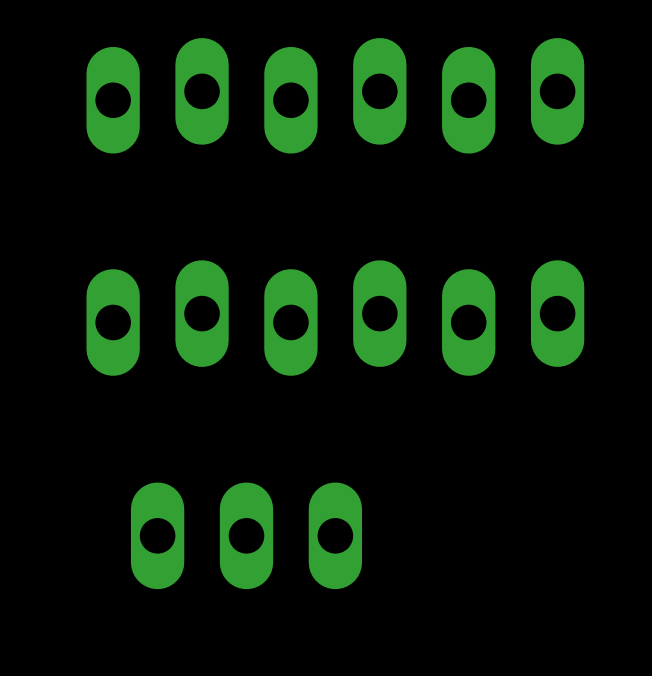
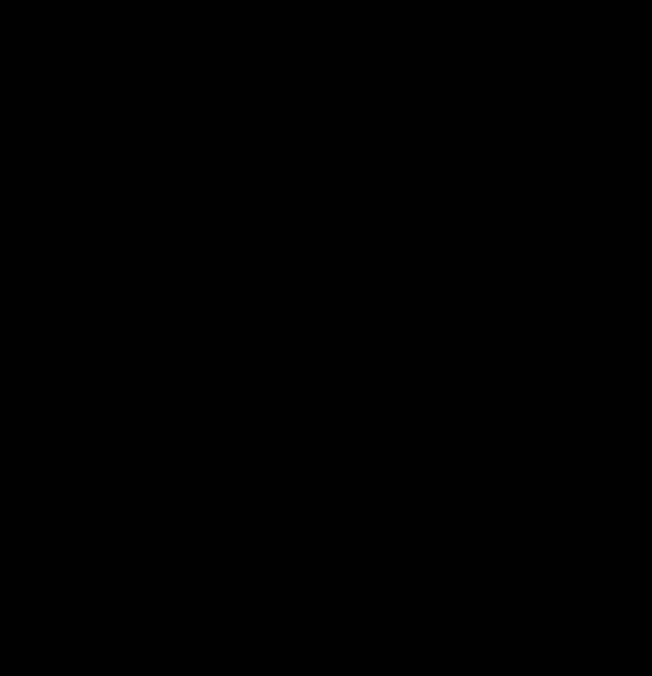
part: (335, 95) -> none
part: (335, 318) -> none
part: (246, 535) -> none

